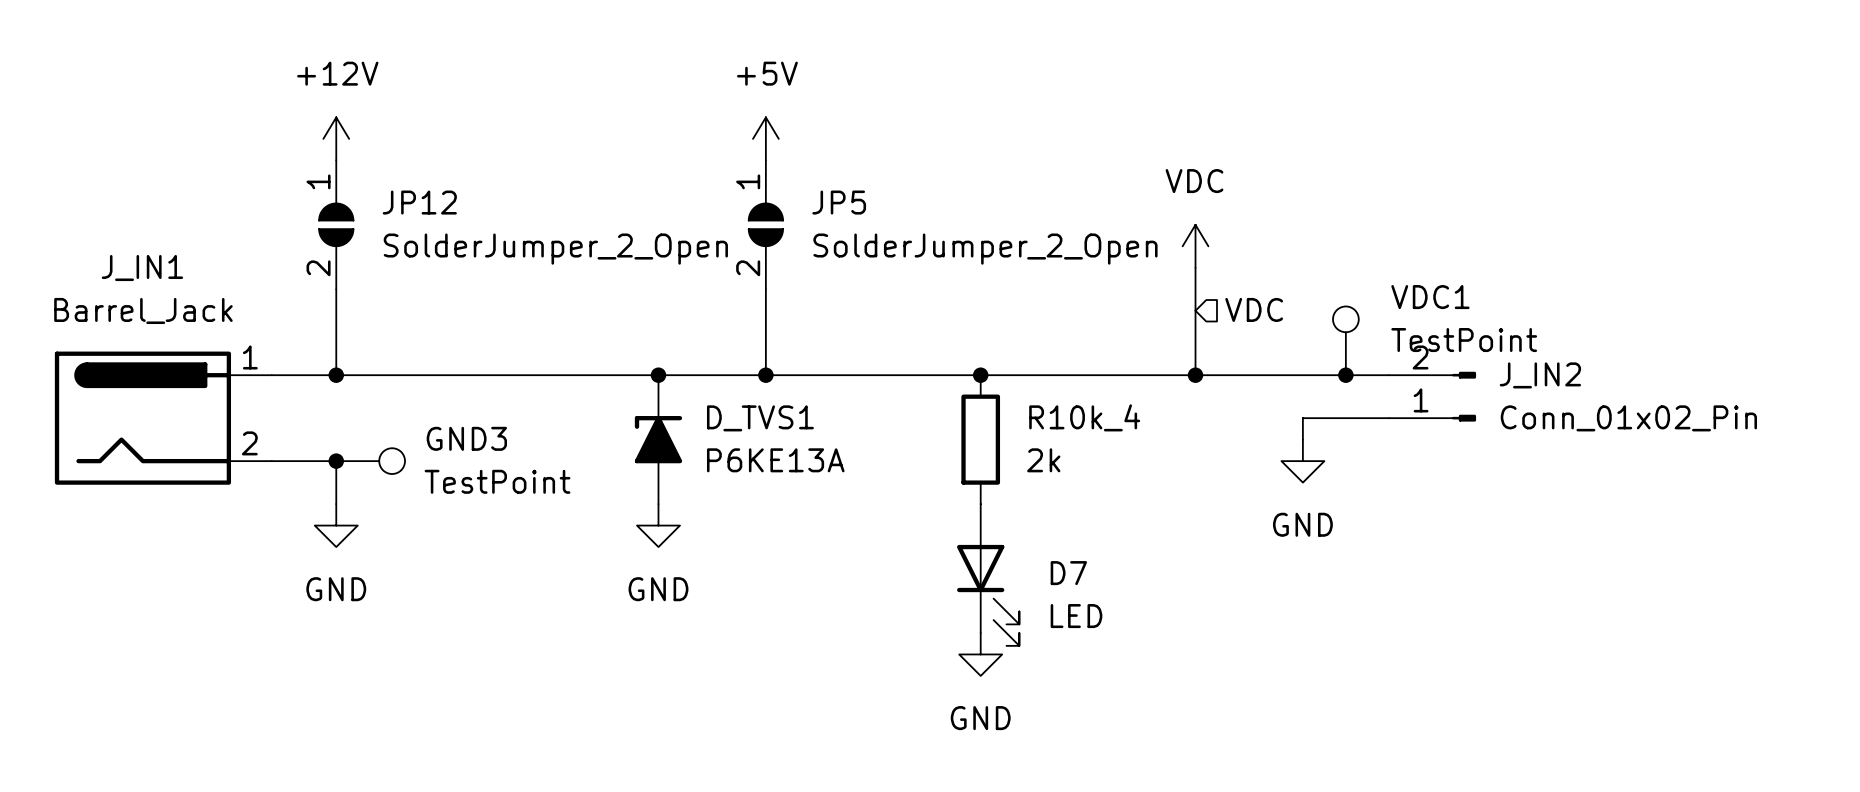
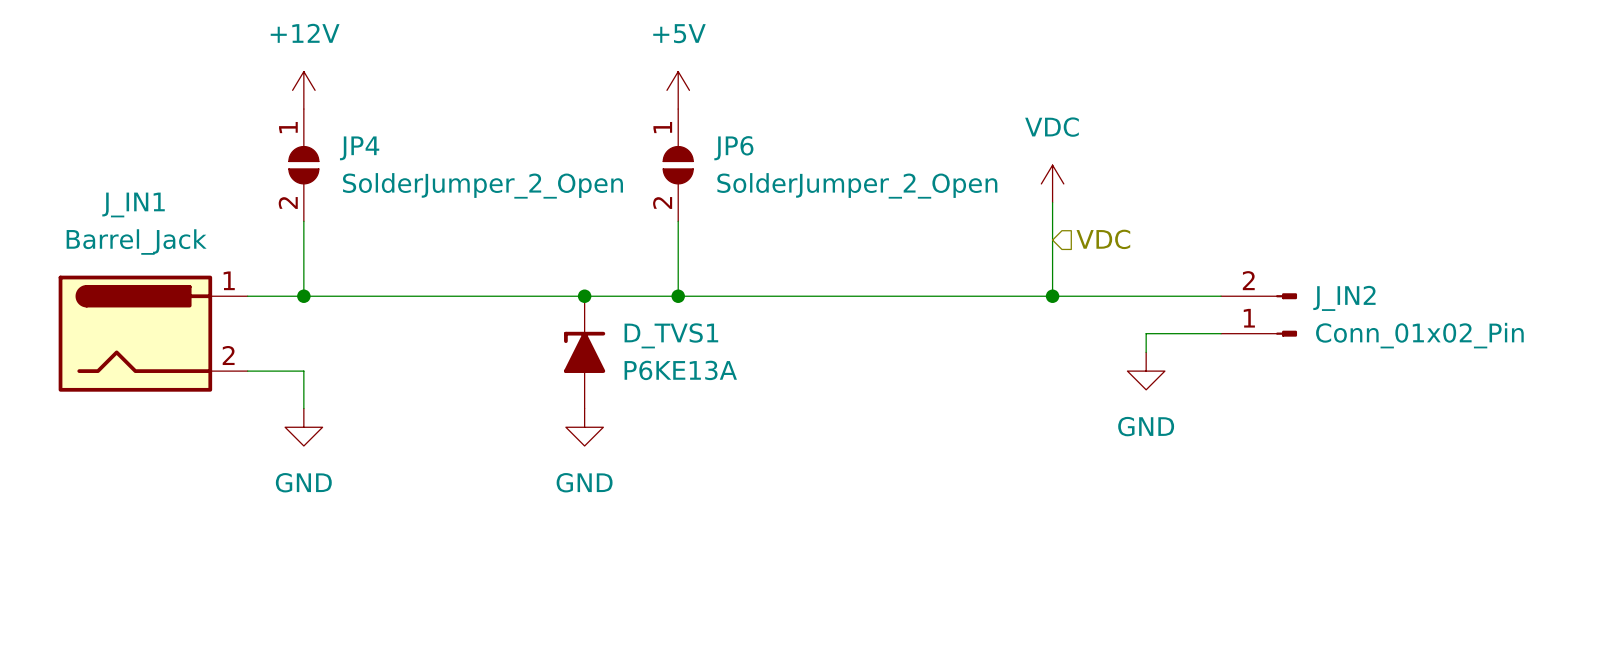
JP12 name: JP12 (419, 202) -> JP4 (359, 148)
JP5 name: JP5 (839, 202) -> JP6 (733, 148)
VDC1: TestPoint (1345, 340) -> none
junction: (980, 375) -> none
junction: (1345, 375) -> none
R10k_4: 2k (980, 439) -> none
junction: (336, 461) -> none
GND3: TestPoint (370, 461) -> none
D7: LED (988, 574) -> none
power symbol: GND (980, 654) -> none

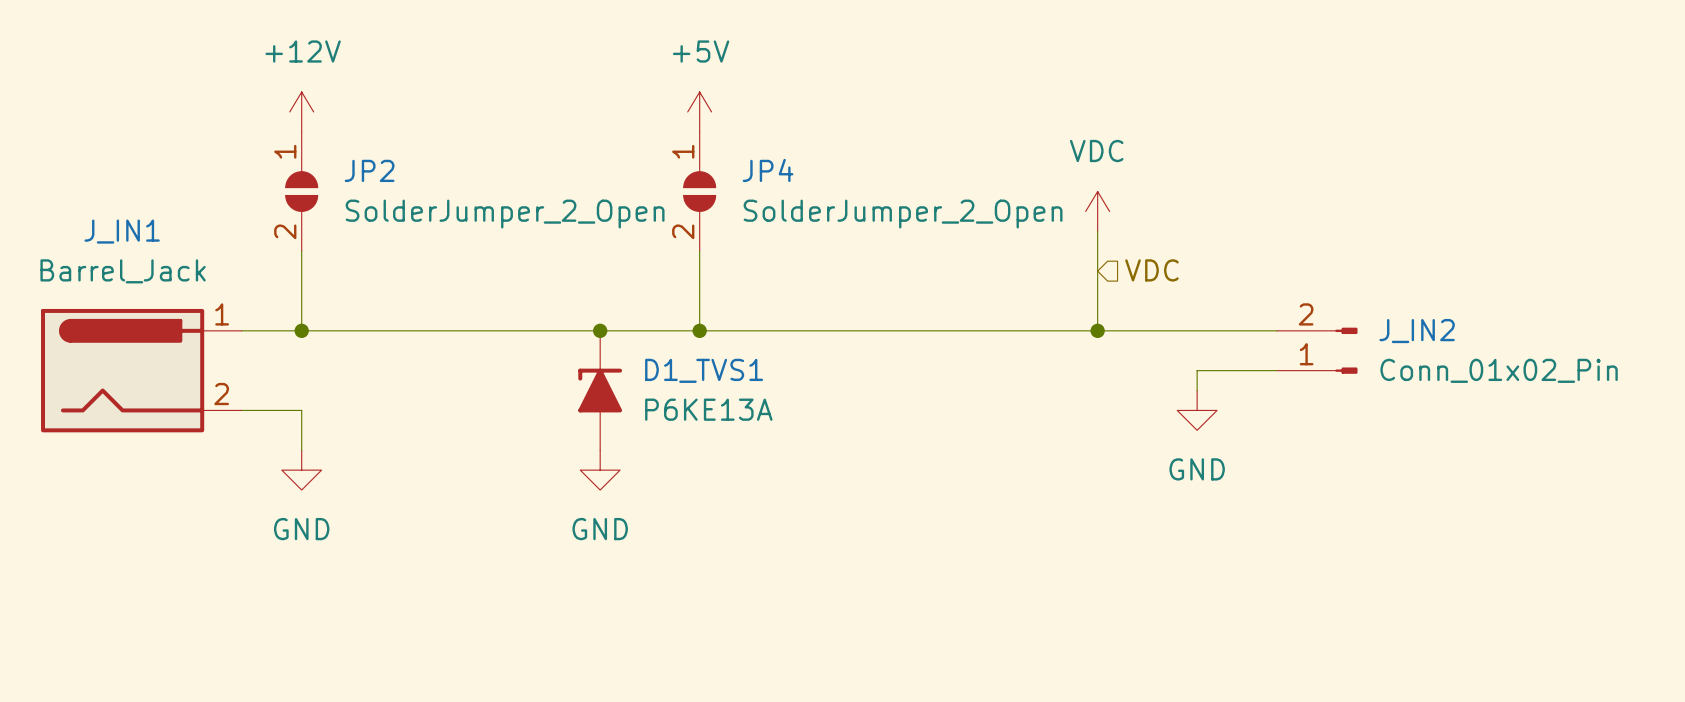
JP4 name: JP4 (359, 148) -> JP2 (369, 170)
JP6 name: JP6 (733, 148) -> JP4 (768, 170)
D_TVS1 name: D_TVS1 (671, 335) -> D1_TVS1 (704, 370)

